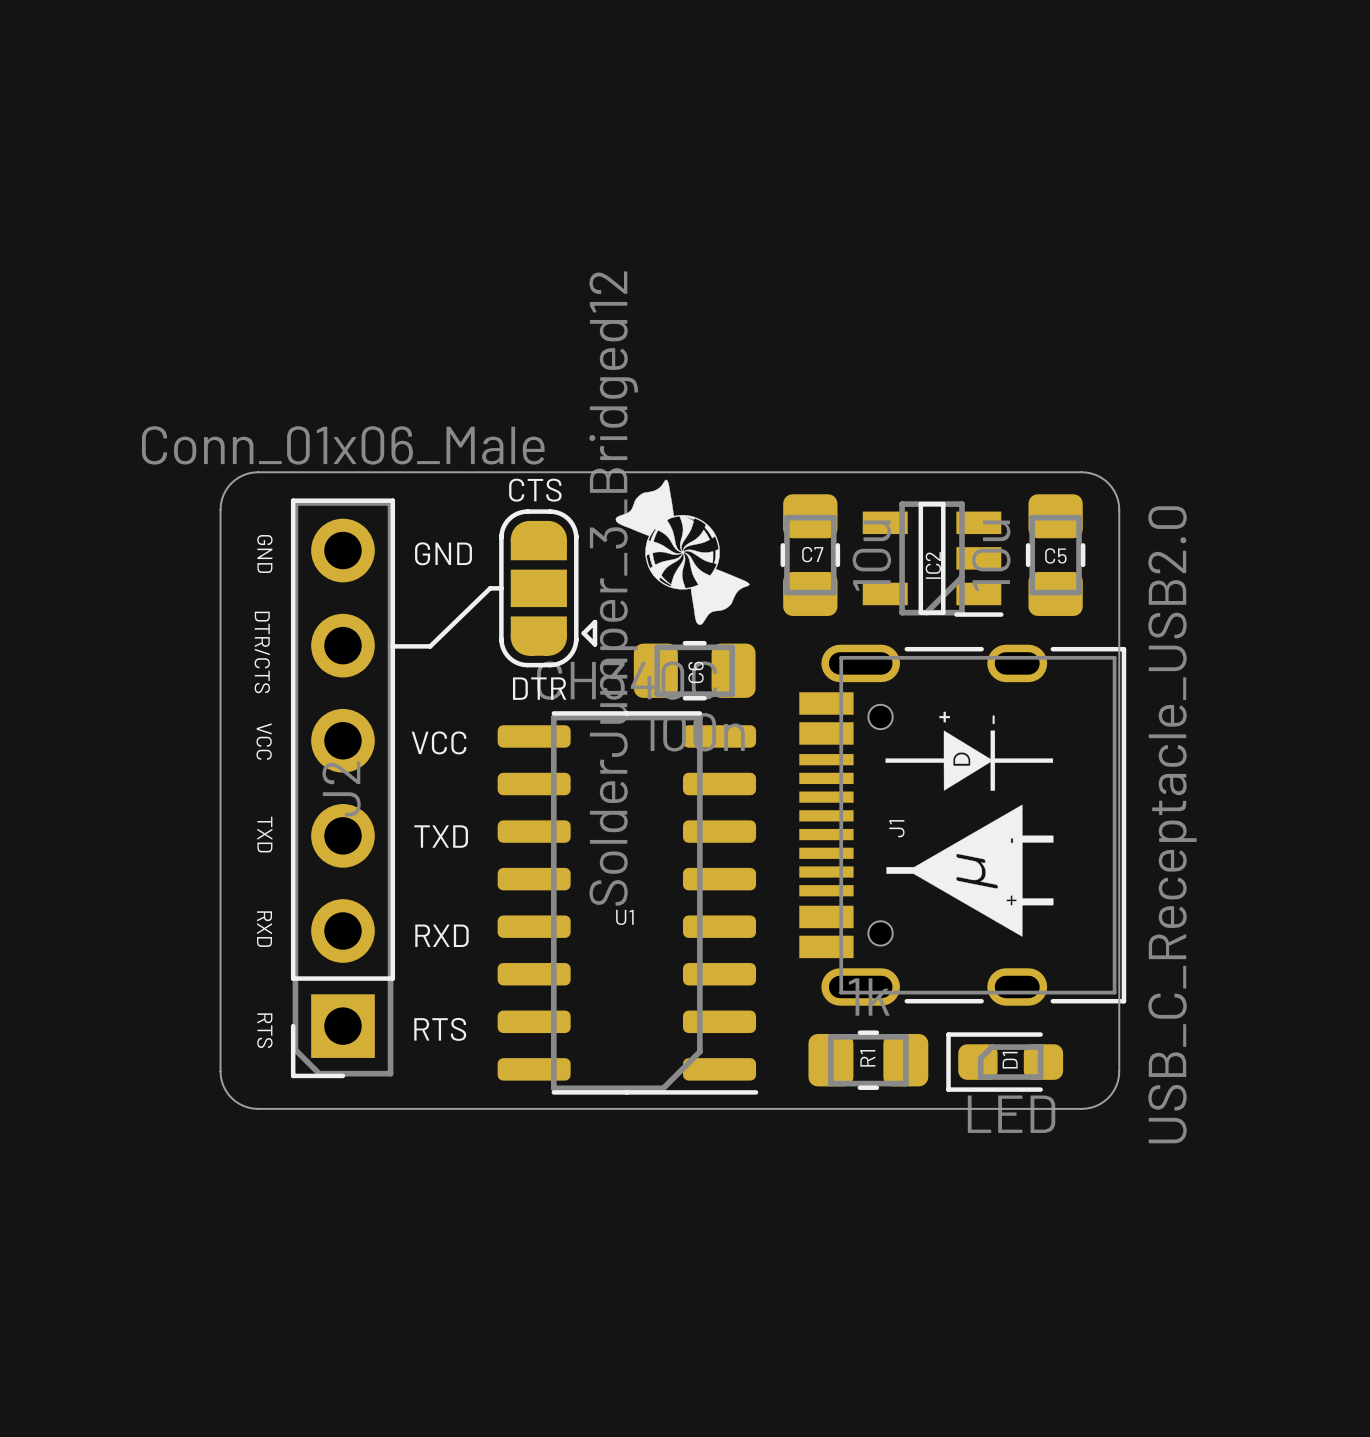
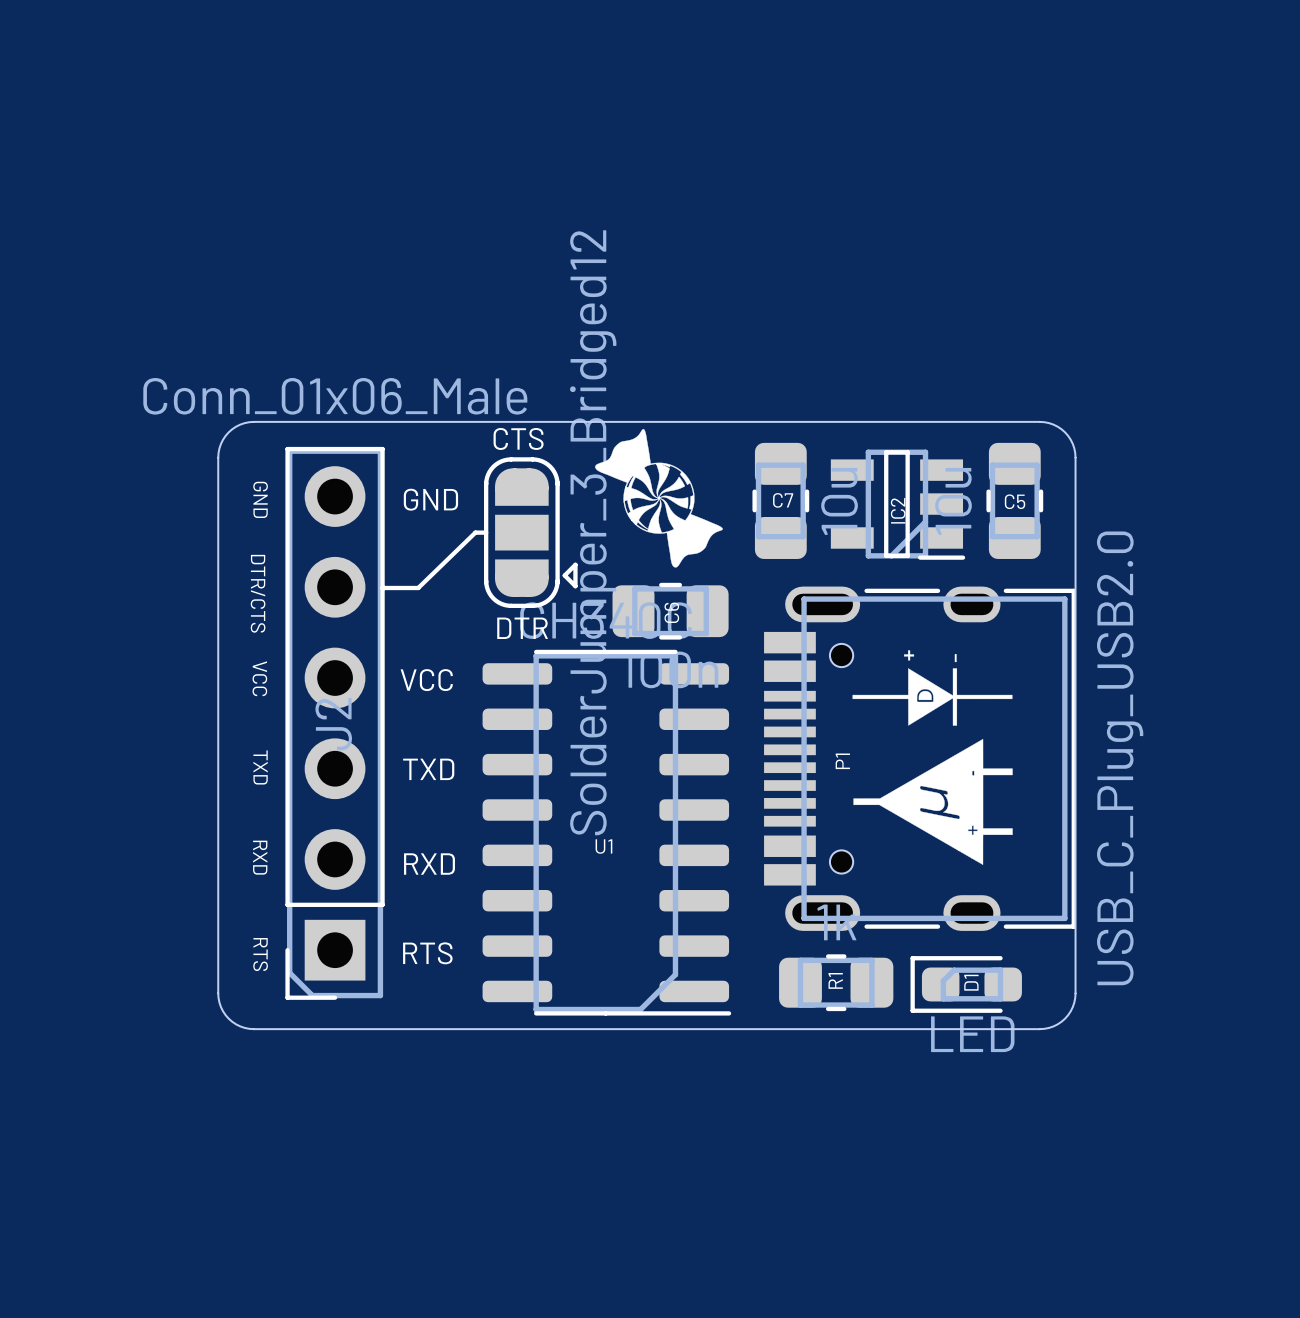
P1: none -> USB_C_Plug_USB2.0 (919, 758)
J1: USB_C_Receptacle_USB2.0 (962, 825) -> none

